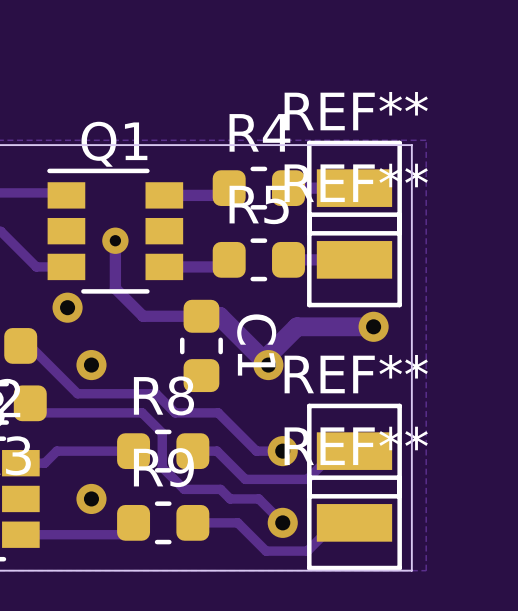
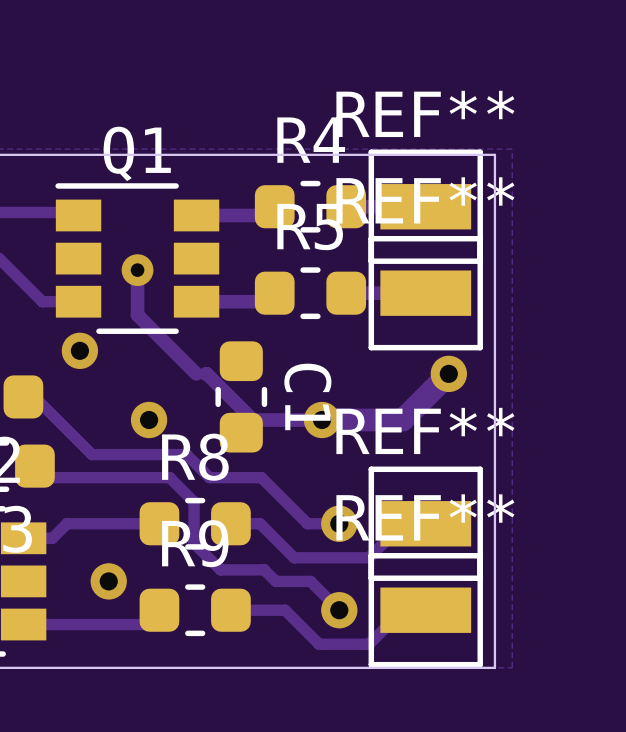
track: (115, 278) (115, 288) (143, 316) (219, 316) (268, 365) (268, 355) (297, 326) (373, 326) -> (205, 373) (253, 420) (402, 420) (448, 373)
track: none -> (137, 315) (196, 373)
via position: (91, 365) -> (149, 420)

